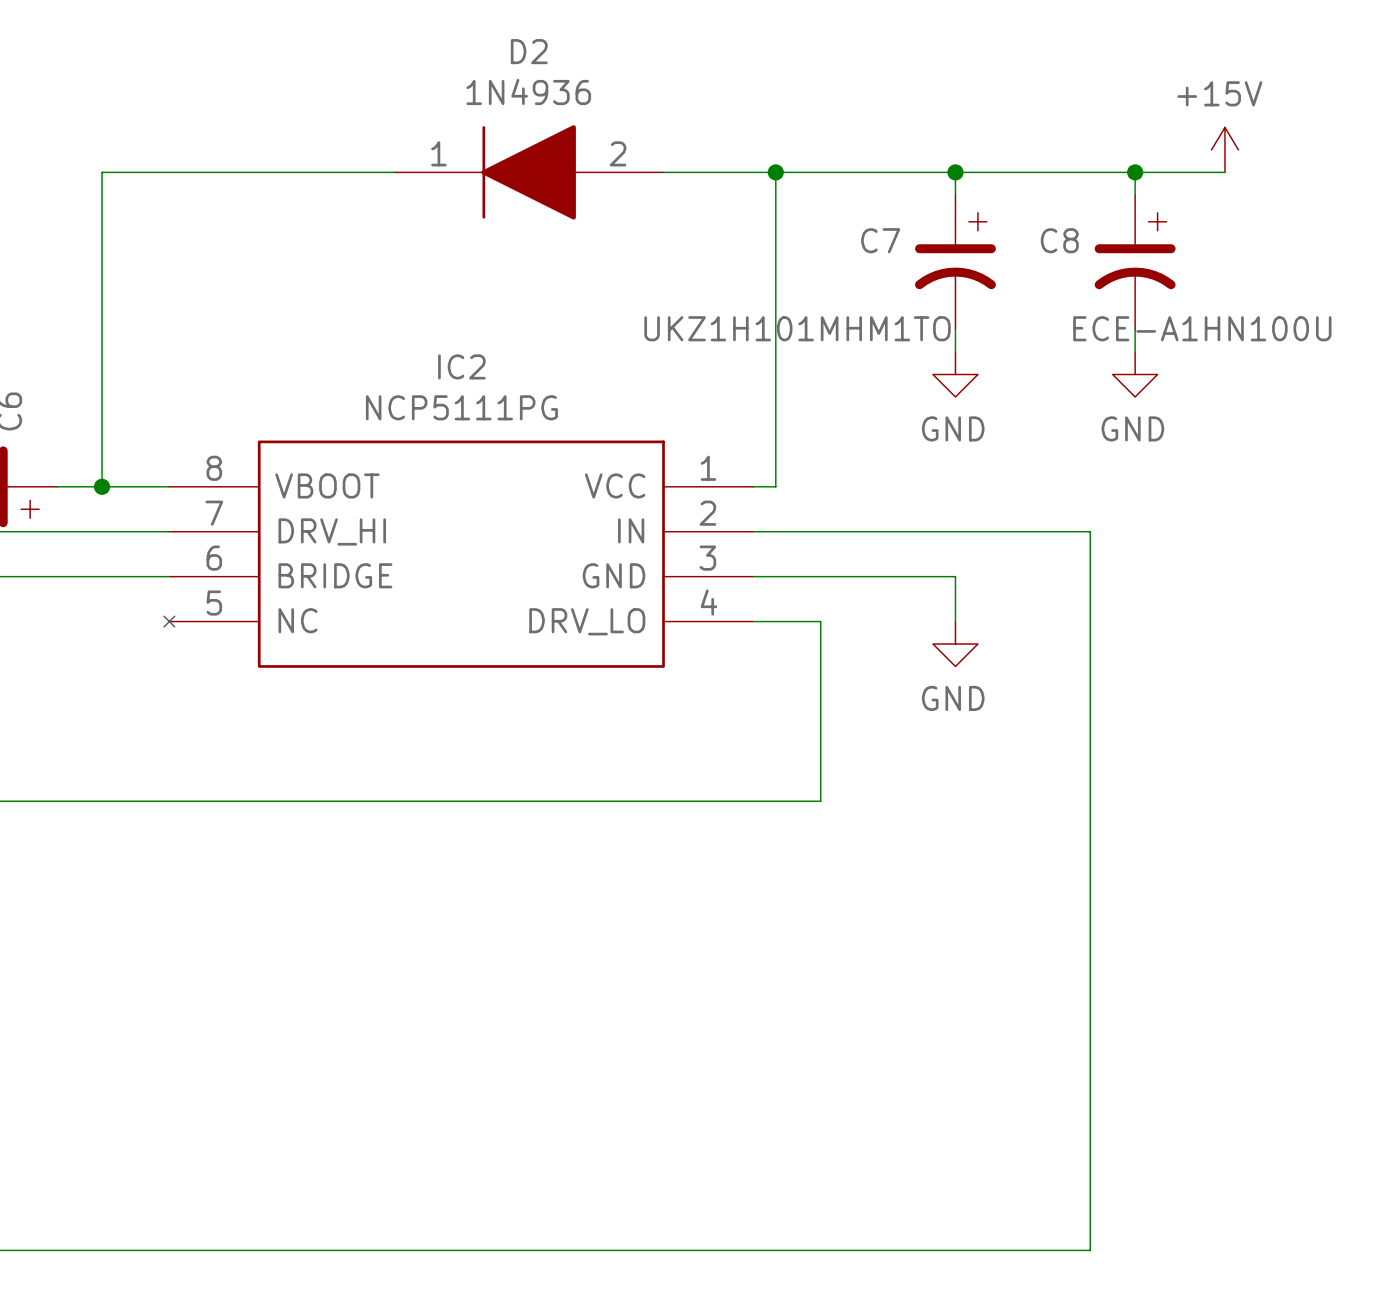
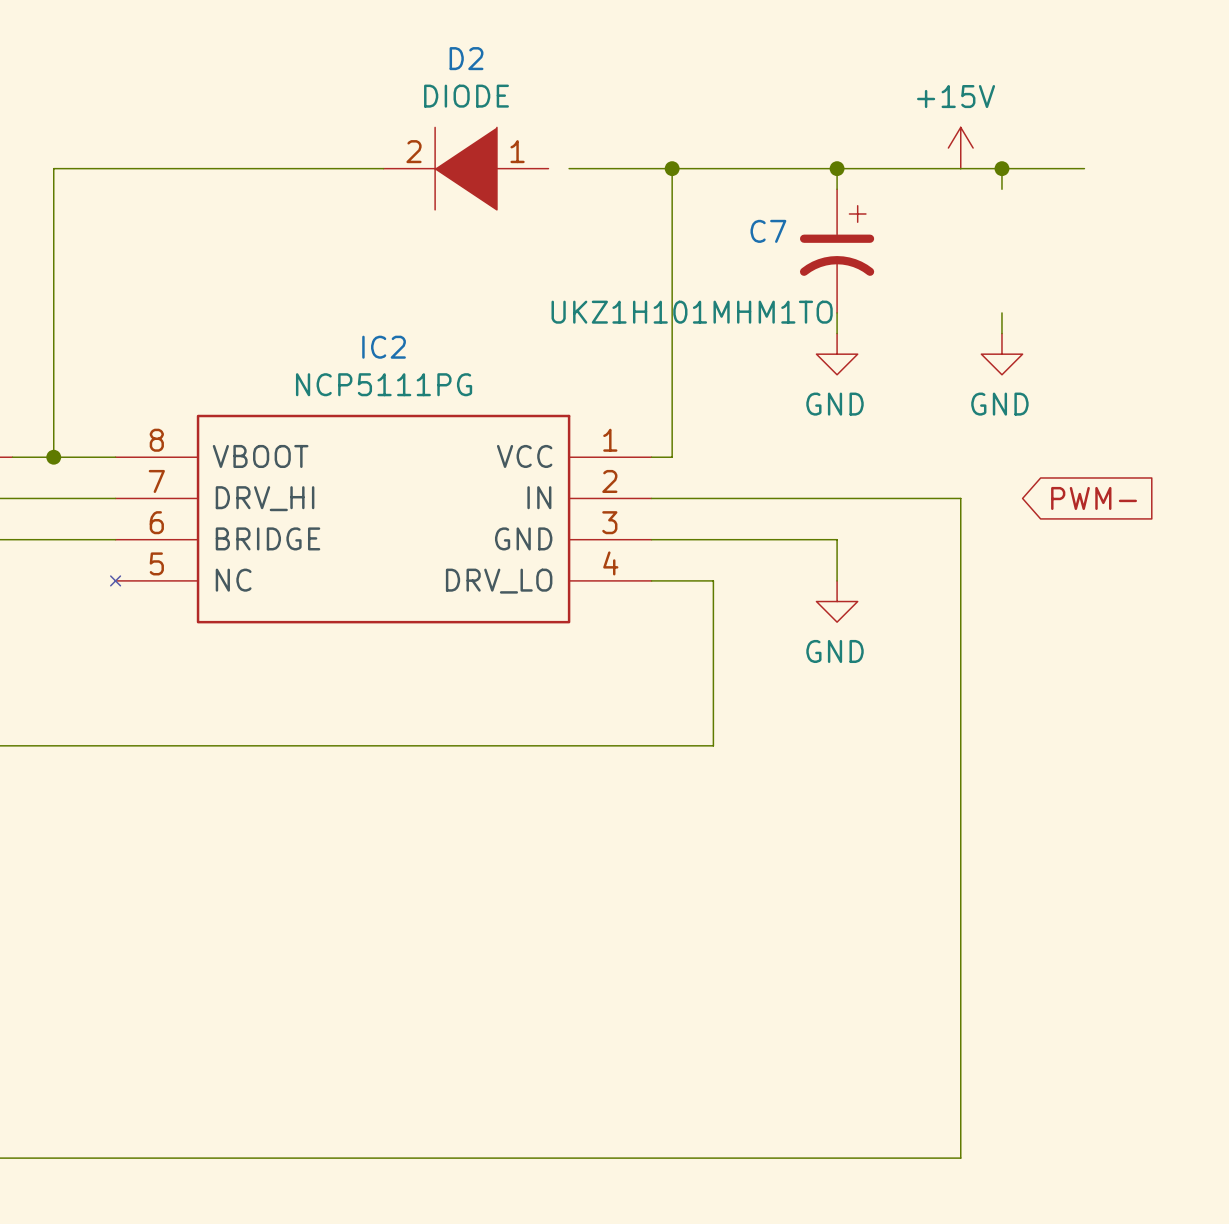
D2 value: 1N4936 (528, 91) -> DIODE (466, 96)
D2 symbol: [393, 125, 664, 220] -> [383, 127, 549, 210]
power symbol position: +15V (1224, 149) -> +15V (960, 148)
C8: ECE-A1HN100U (1135, 262) -> none
global label: none -> PWM- (1094, 498)

